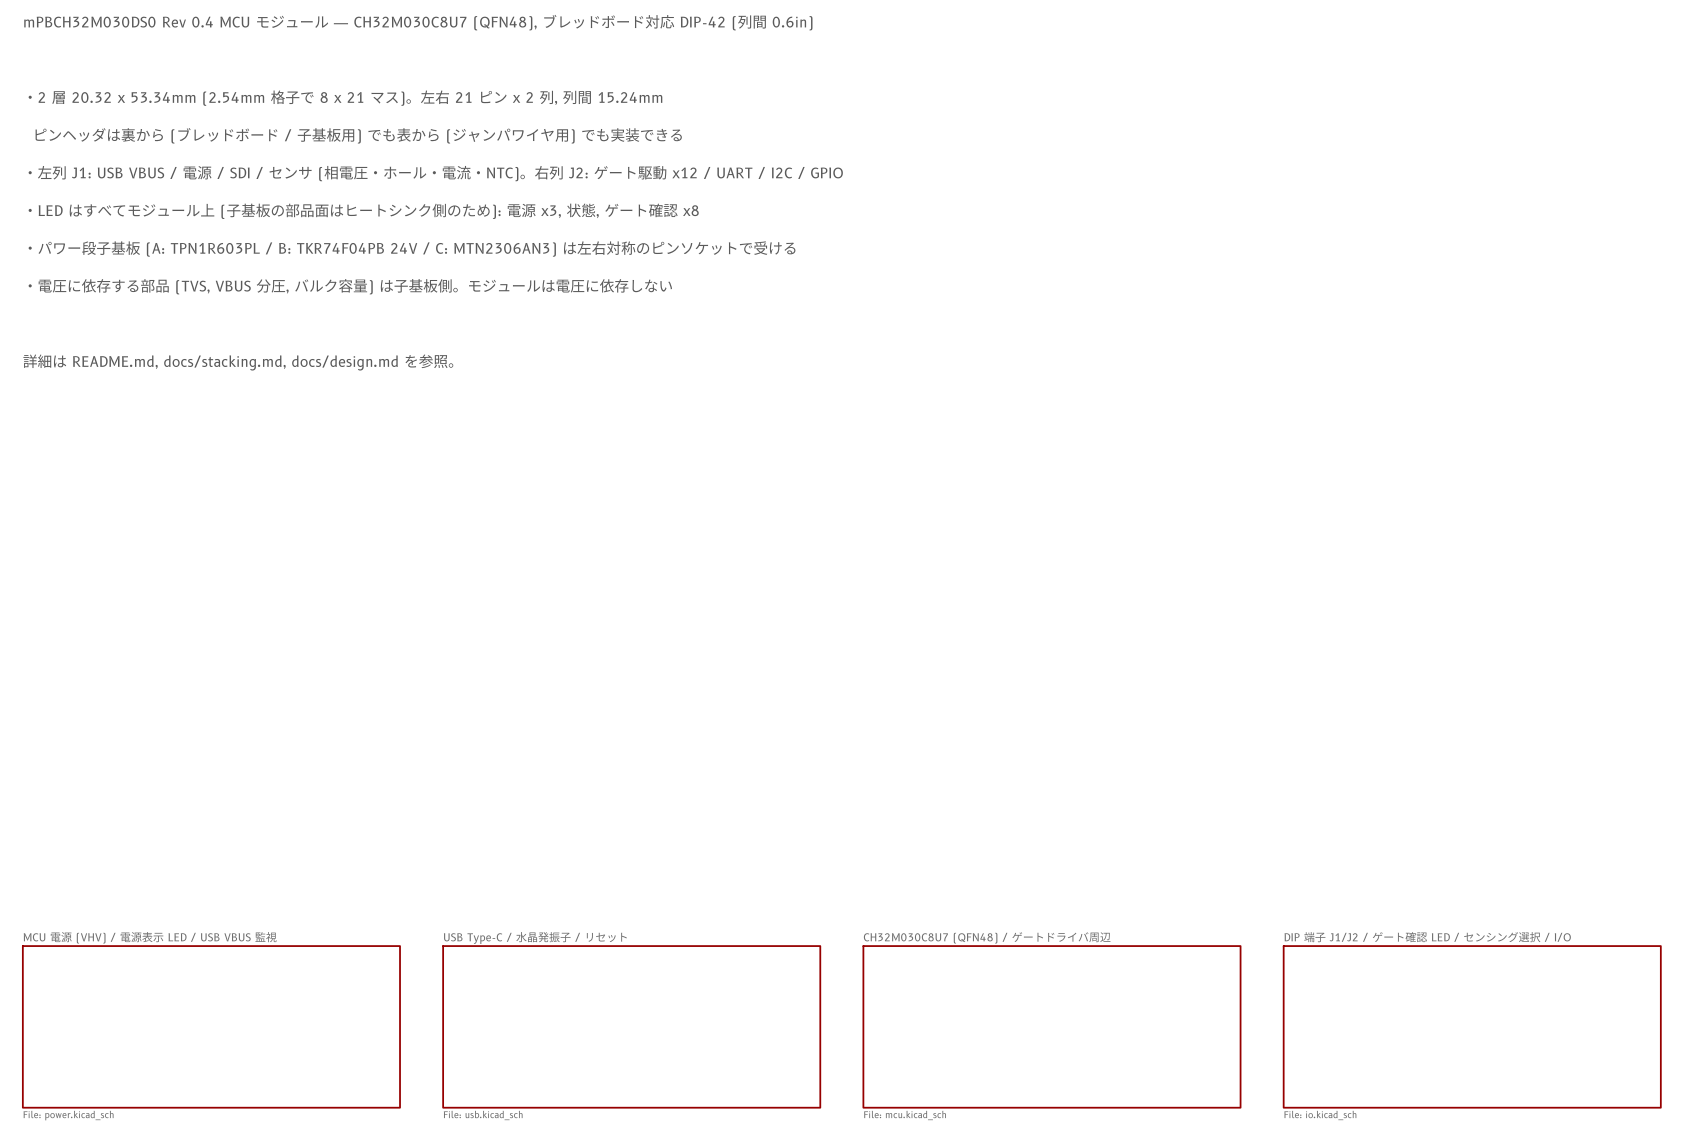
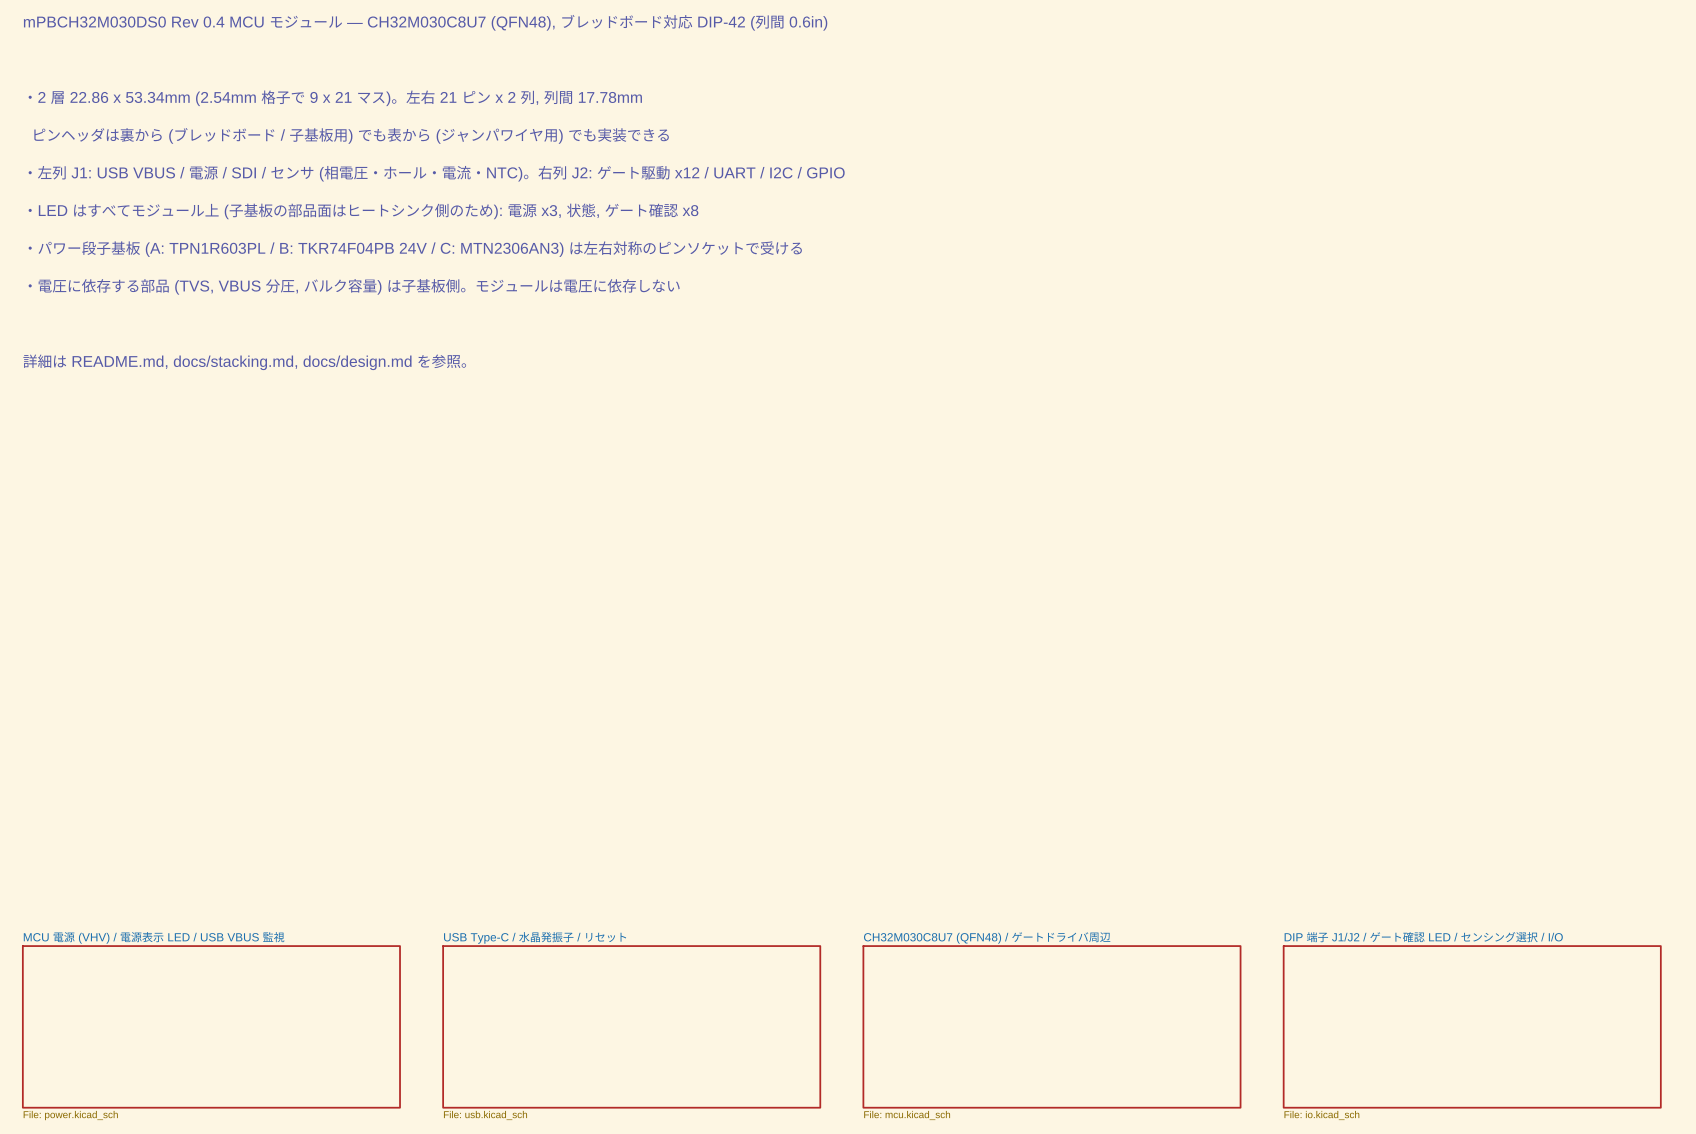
text: ・2 層 20.32 x 53.34mm (2.54mm 格子で 8 x 21 マス)。左右 21 ピン x 2 列, 列間 15.24mm (345, 98) -> ・2 層 22.86 x 53.34mm (2.54mm 格子で 9 x 21 マス)。左右 21 ピン x 2 列, 列間 17.78mm (335, 98)

